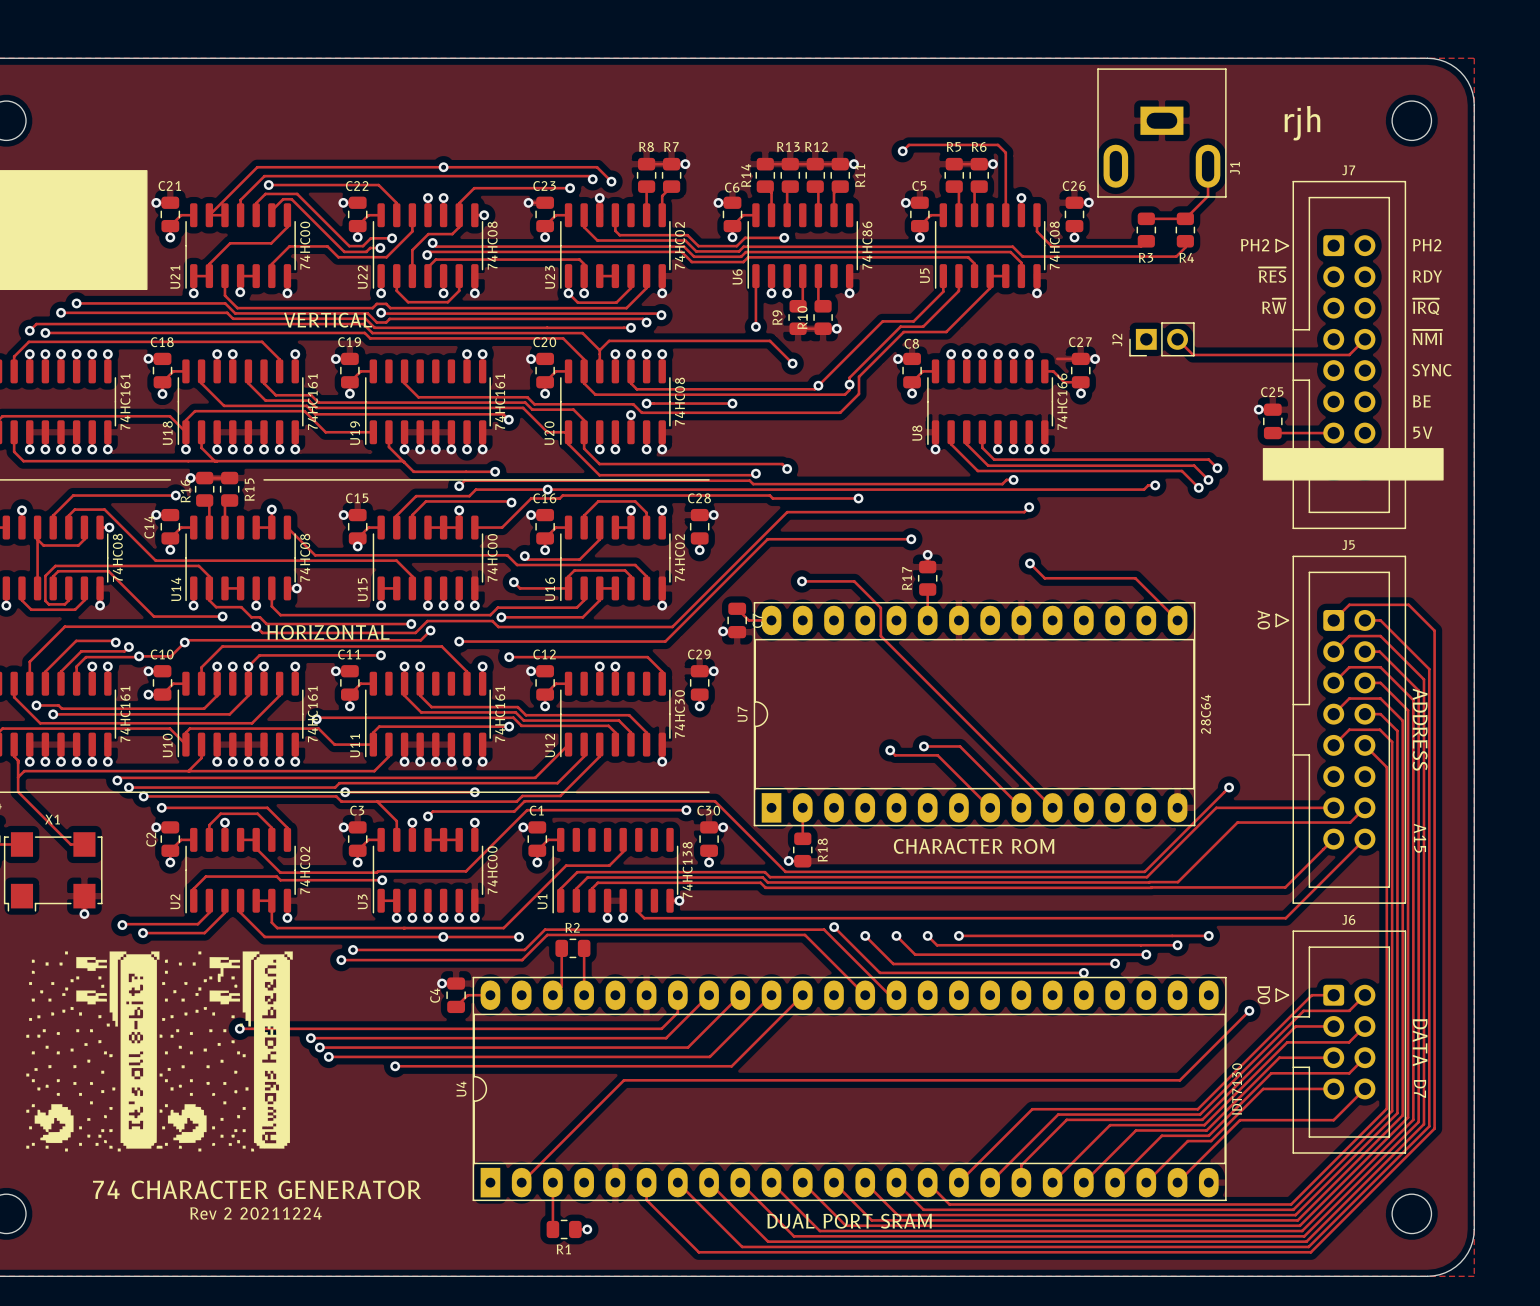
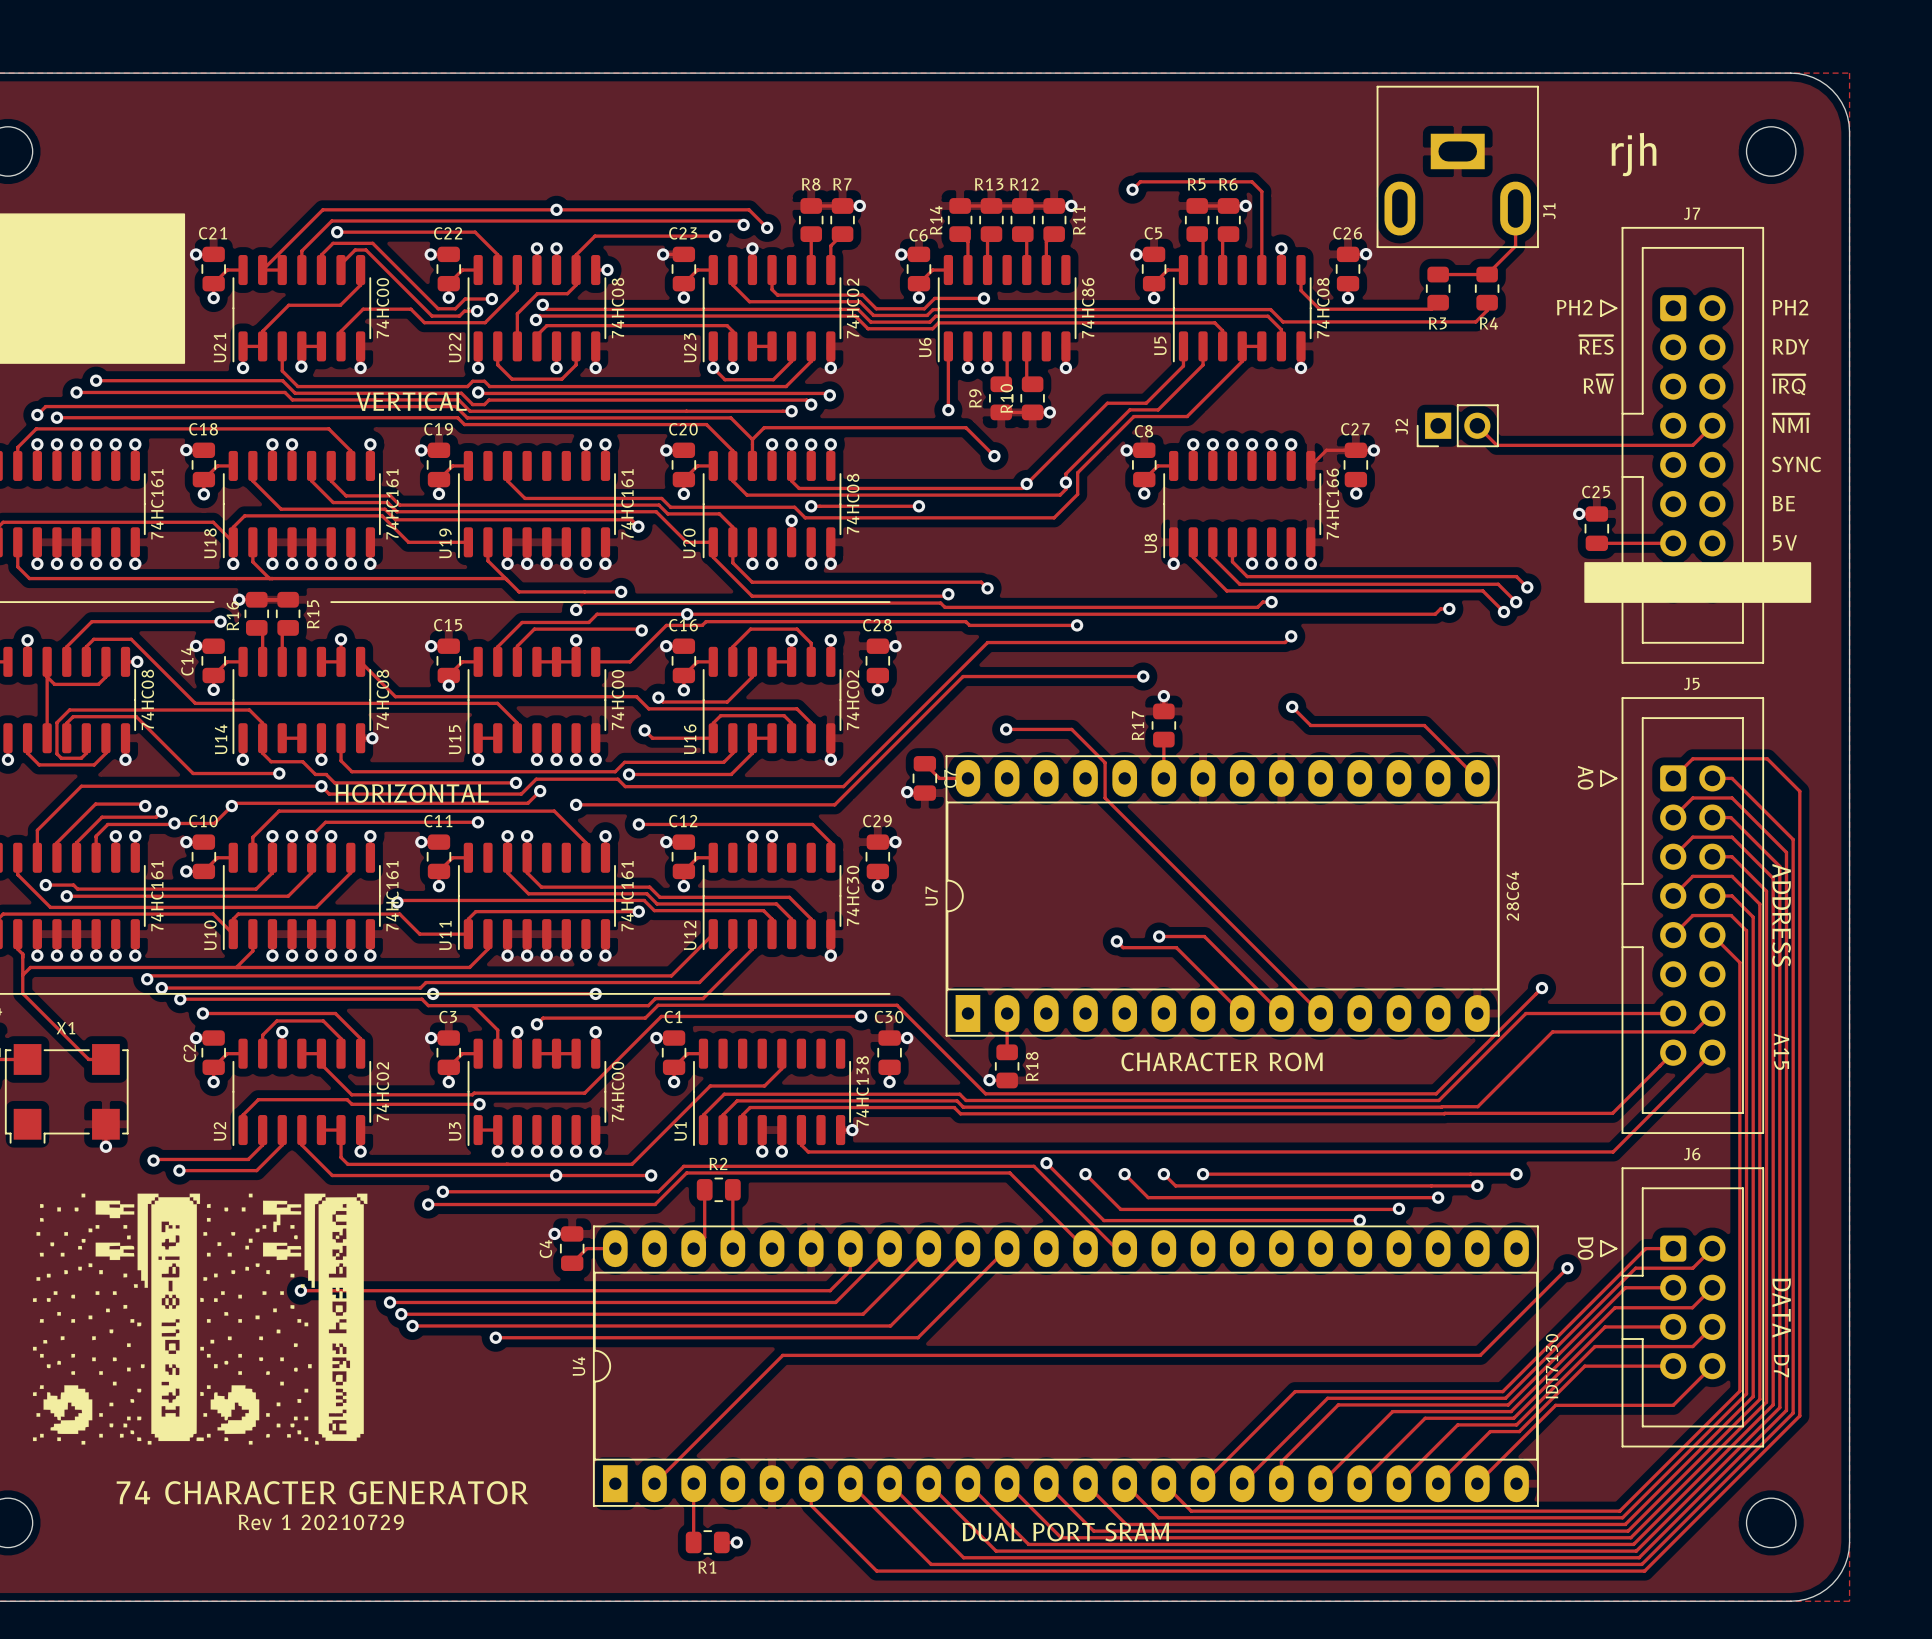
track: (1044, 371) (1053, 371) (1064, 382) (1080, 382) -> (1310, 465) (1326, 450)
text: Rev 2 20211224 (256, 1213) -> Rev 1 20210729 (321, 1522)

